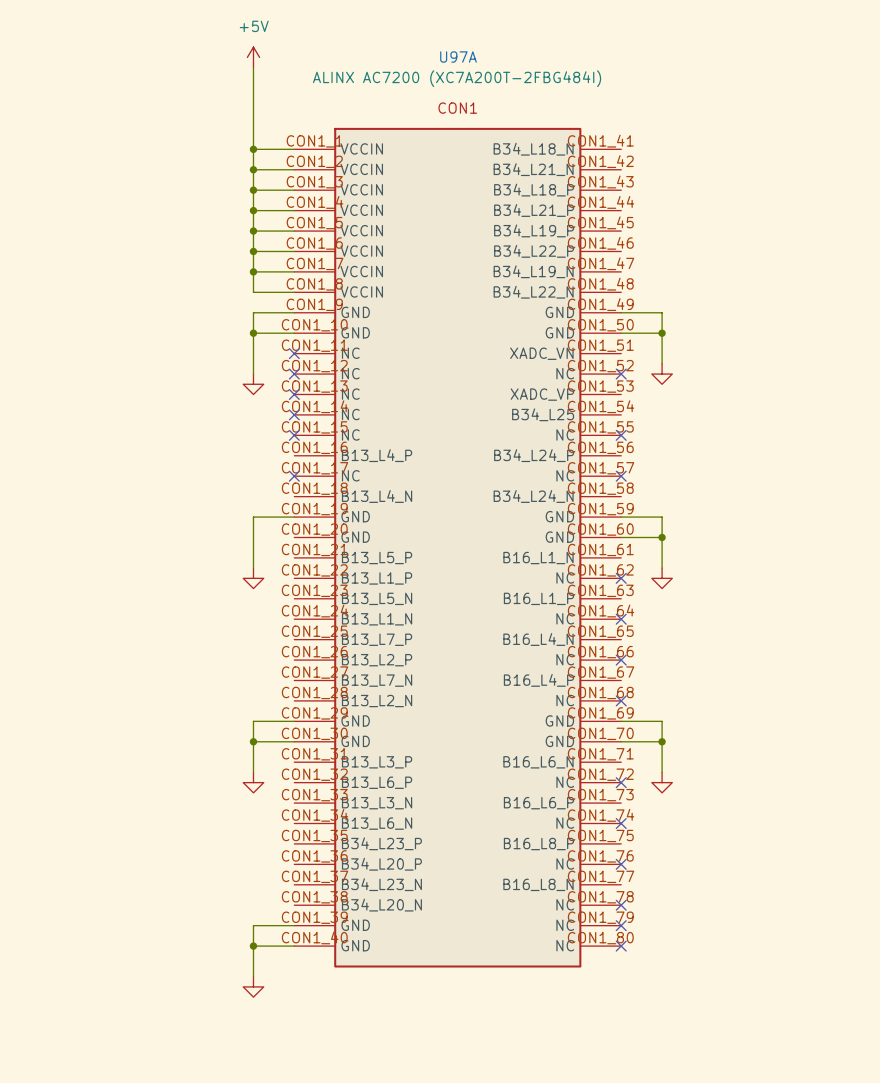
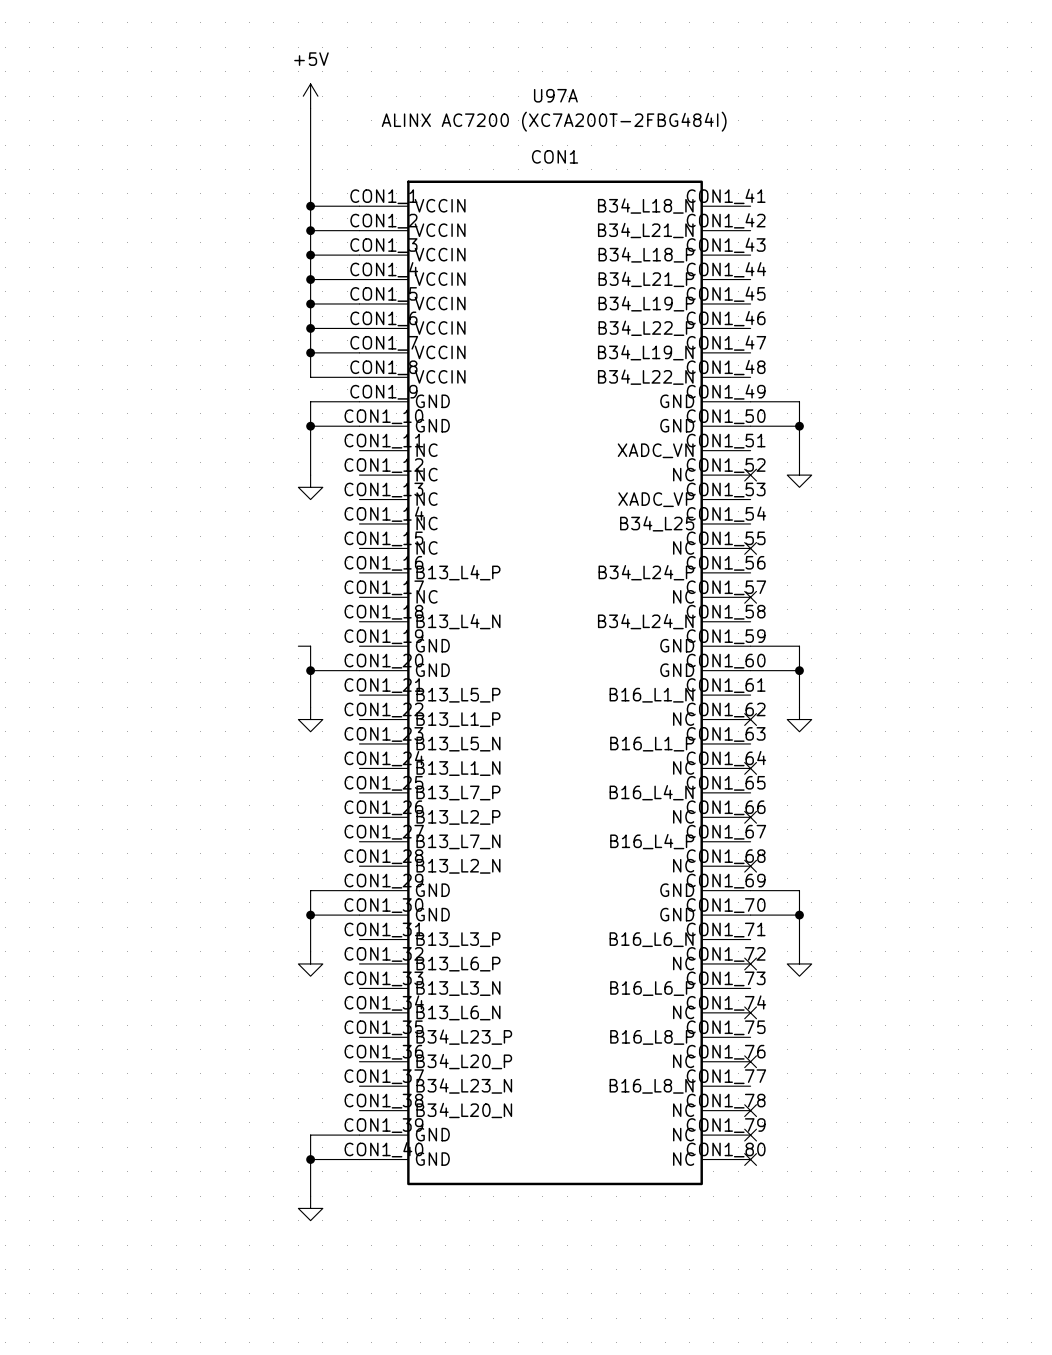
no-connect mark: (294, 353) -> none
no-connect mark: (294, 374) -> none
no-connect mark: (294, 394) -> none
no-connect mark: (294, 414) -> none
no-connect mark: (294, 435) -> none
no-connect mark: (294, 476) -> none
wire: (253, 517) (294, 517) -> (310, 646) (298, 646)
wire: none -> (310, 670) (359, 670)
junction: none -> (310, 670)

